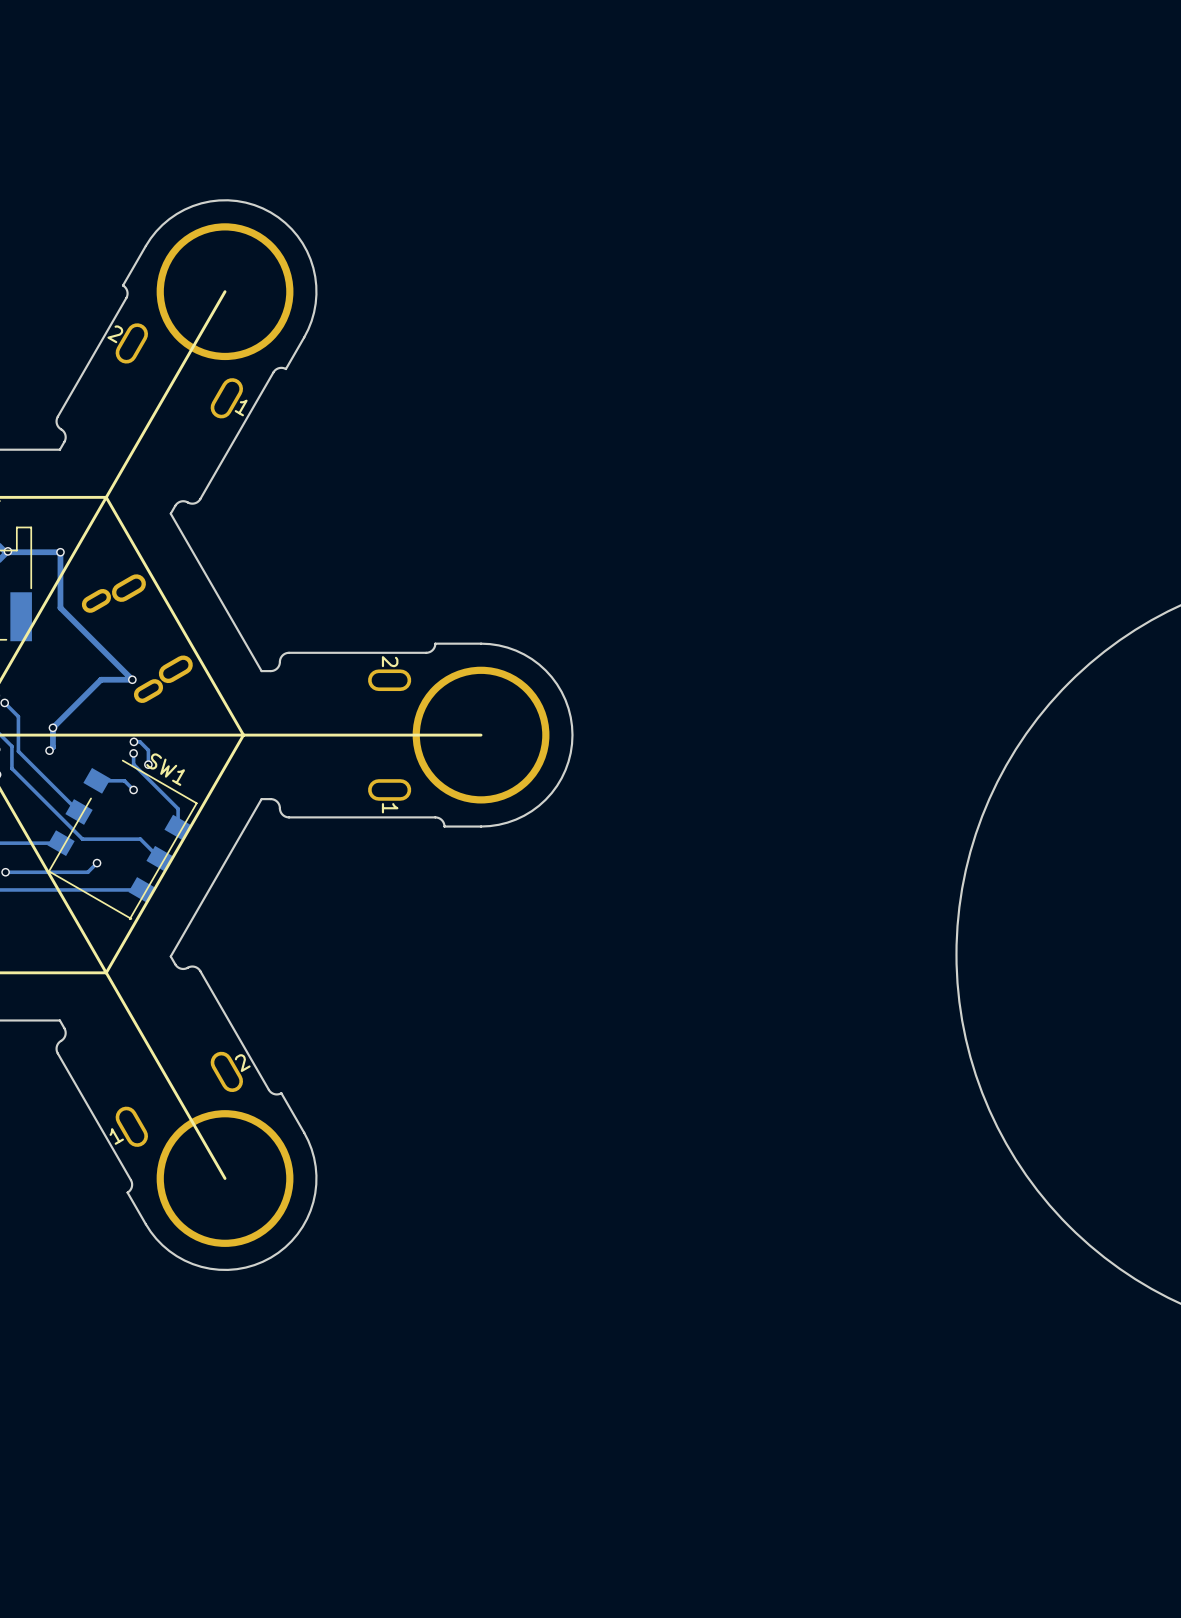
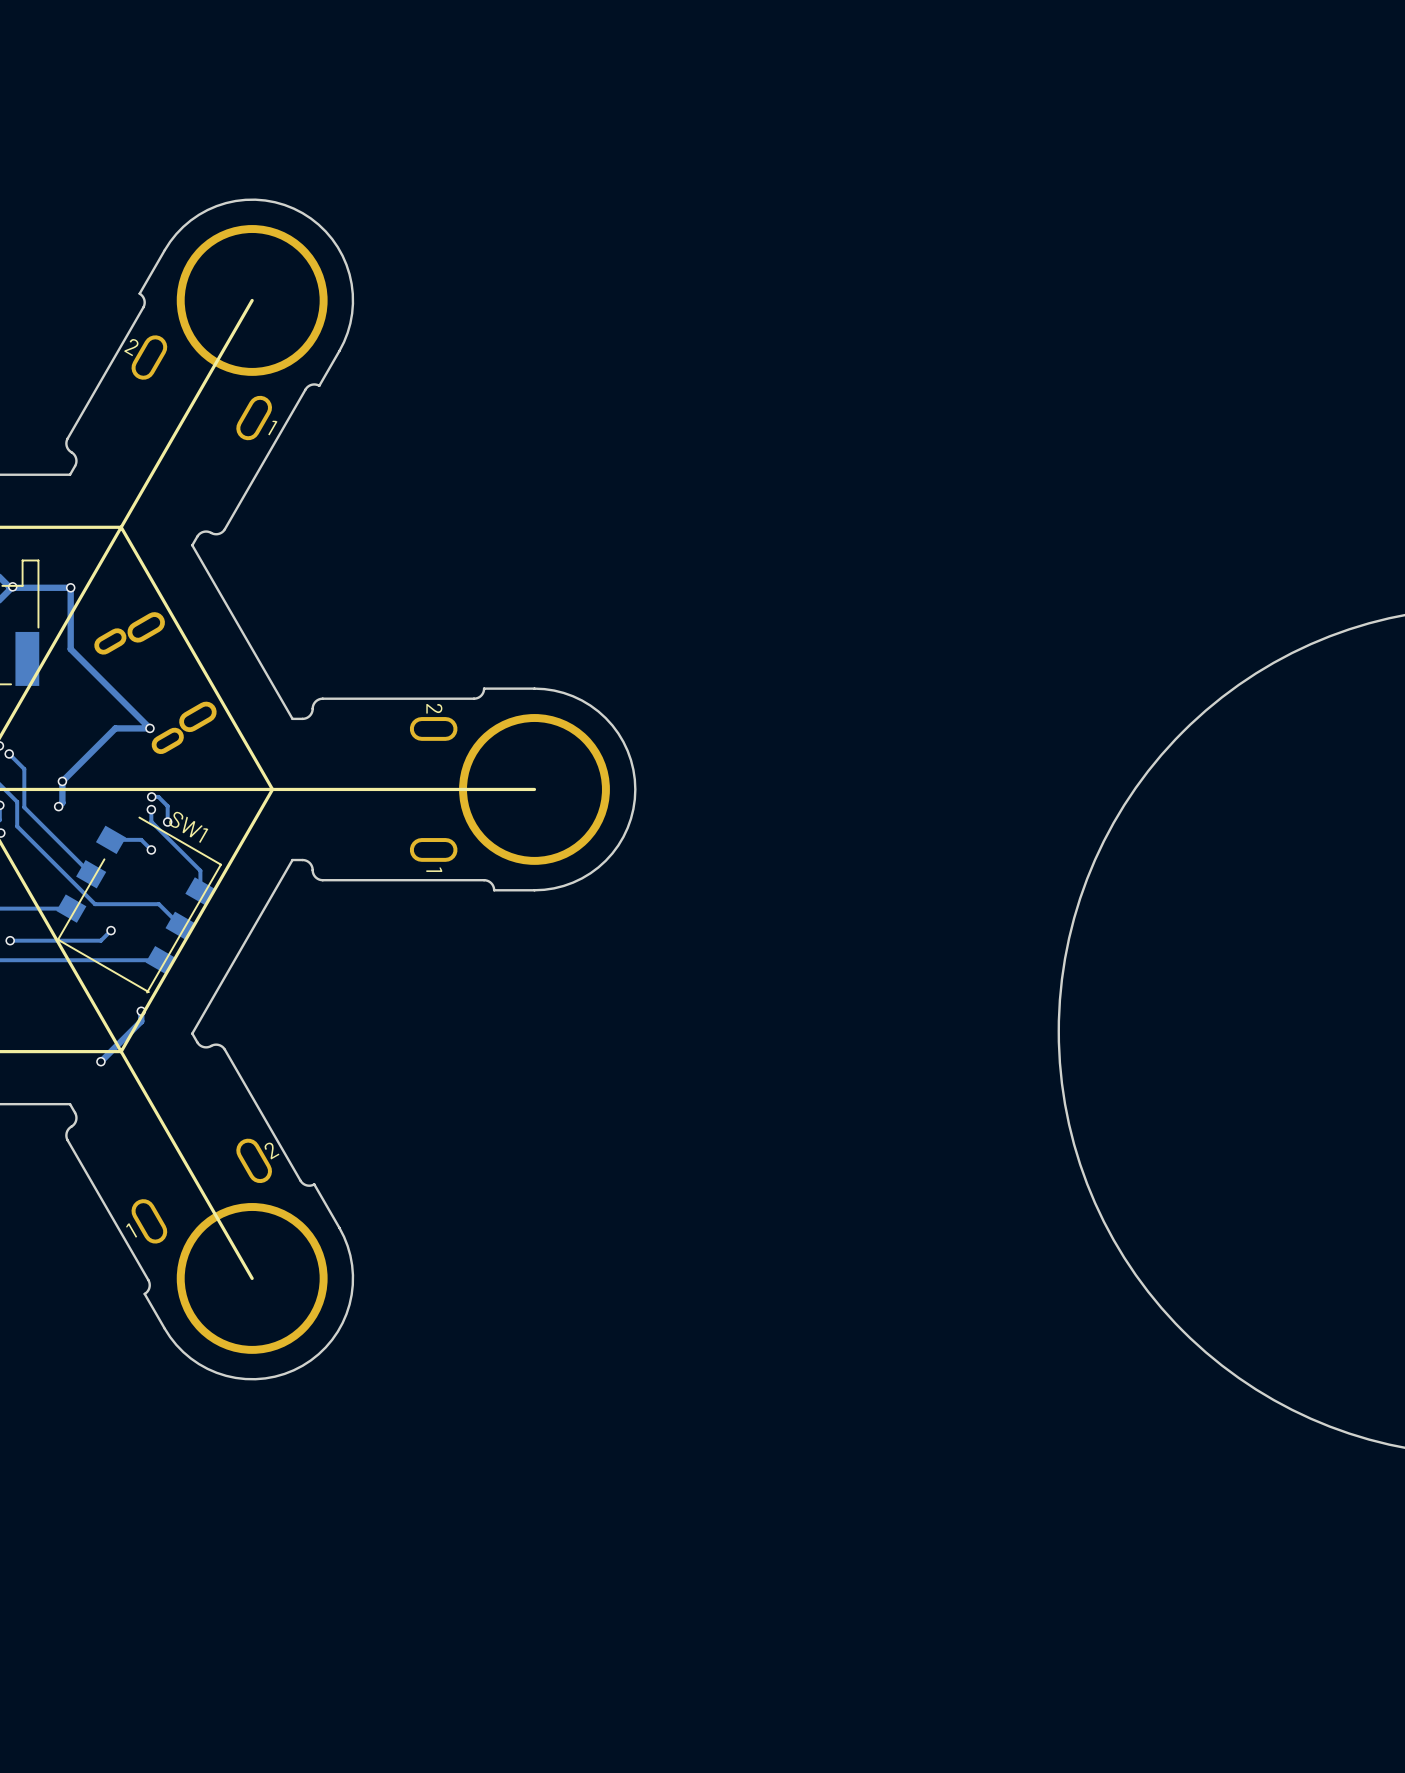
track: none -> (141, 1011) (141, 1021) (100, 1061)
via: none -> (141, 1011)
via: none -> (100, 1061)

